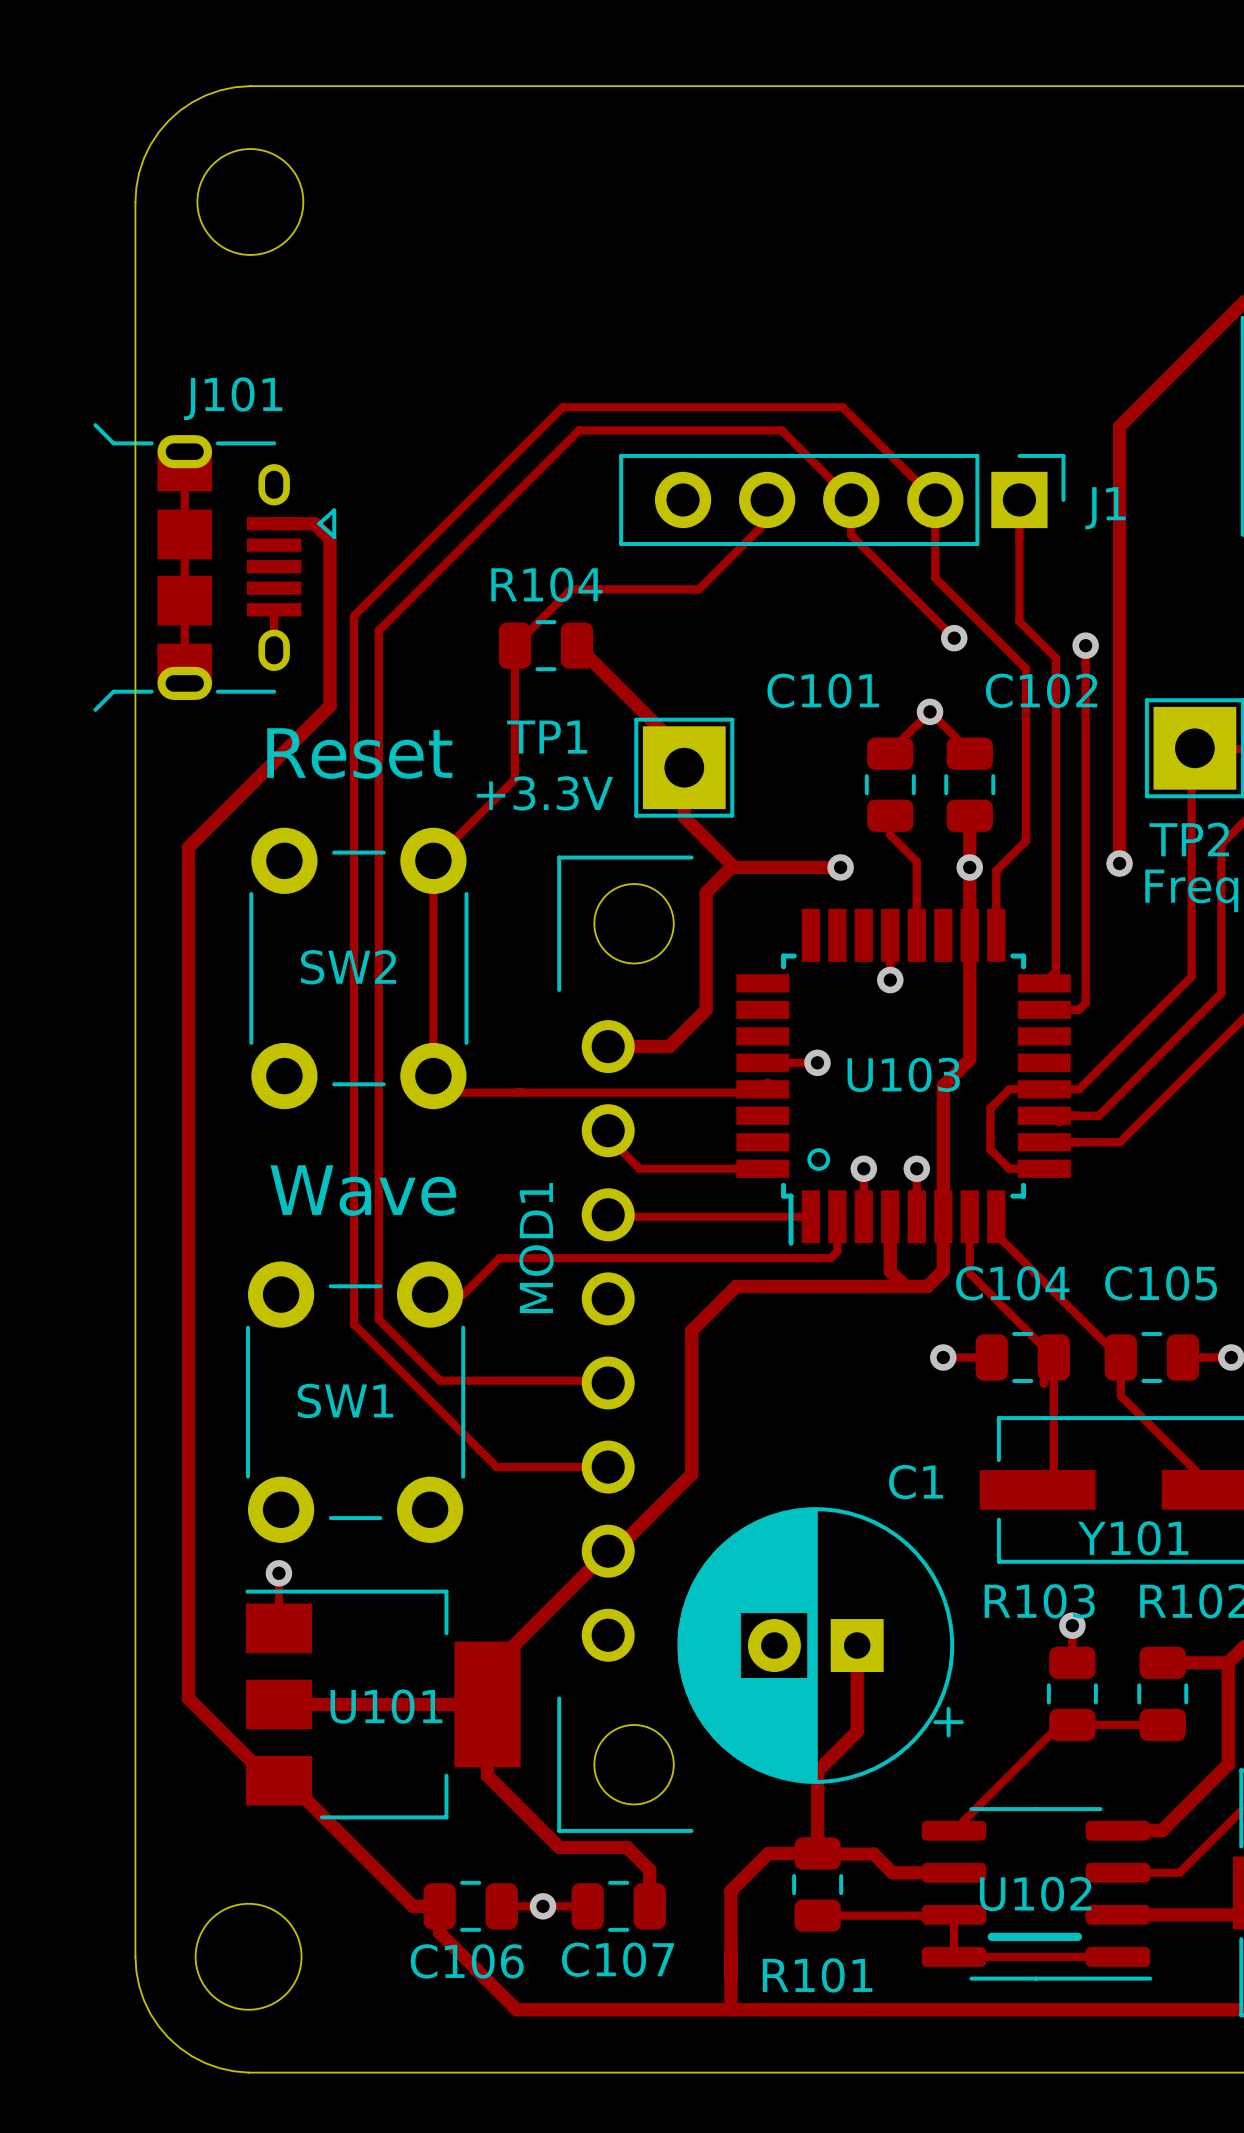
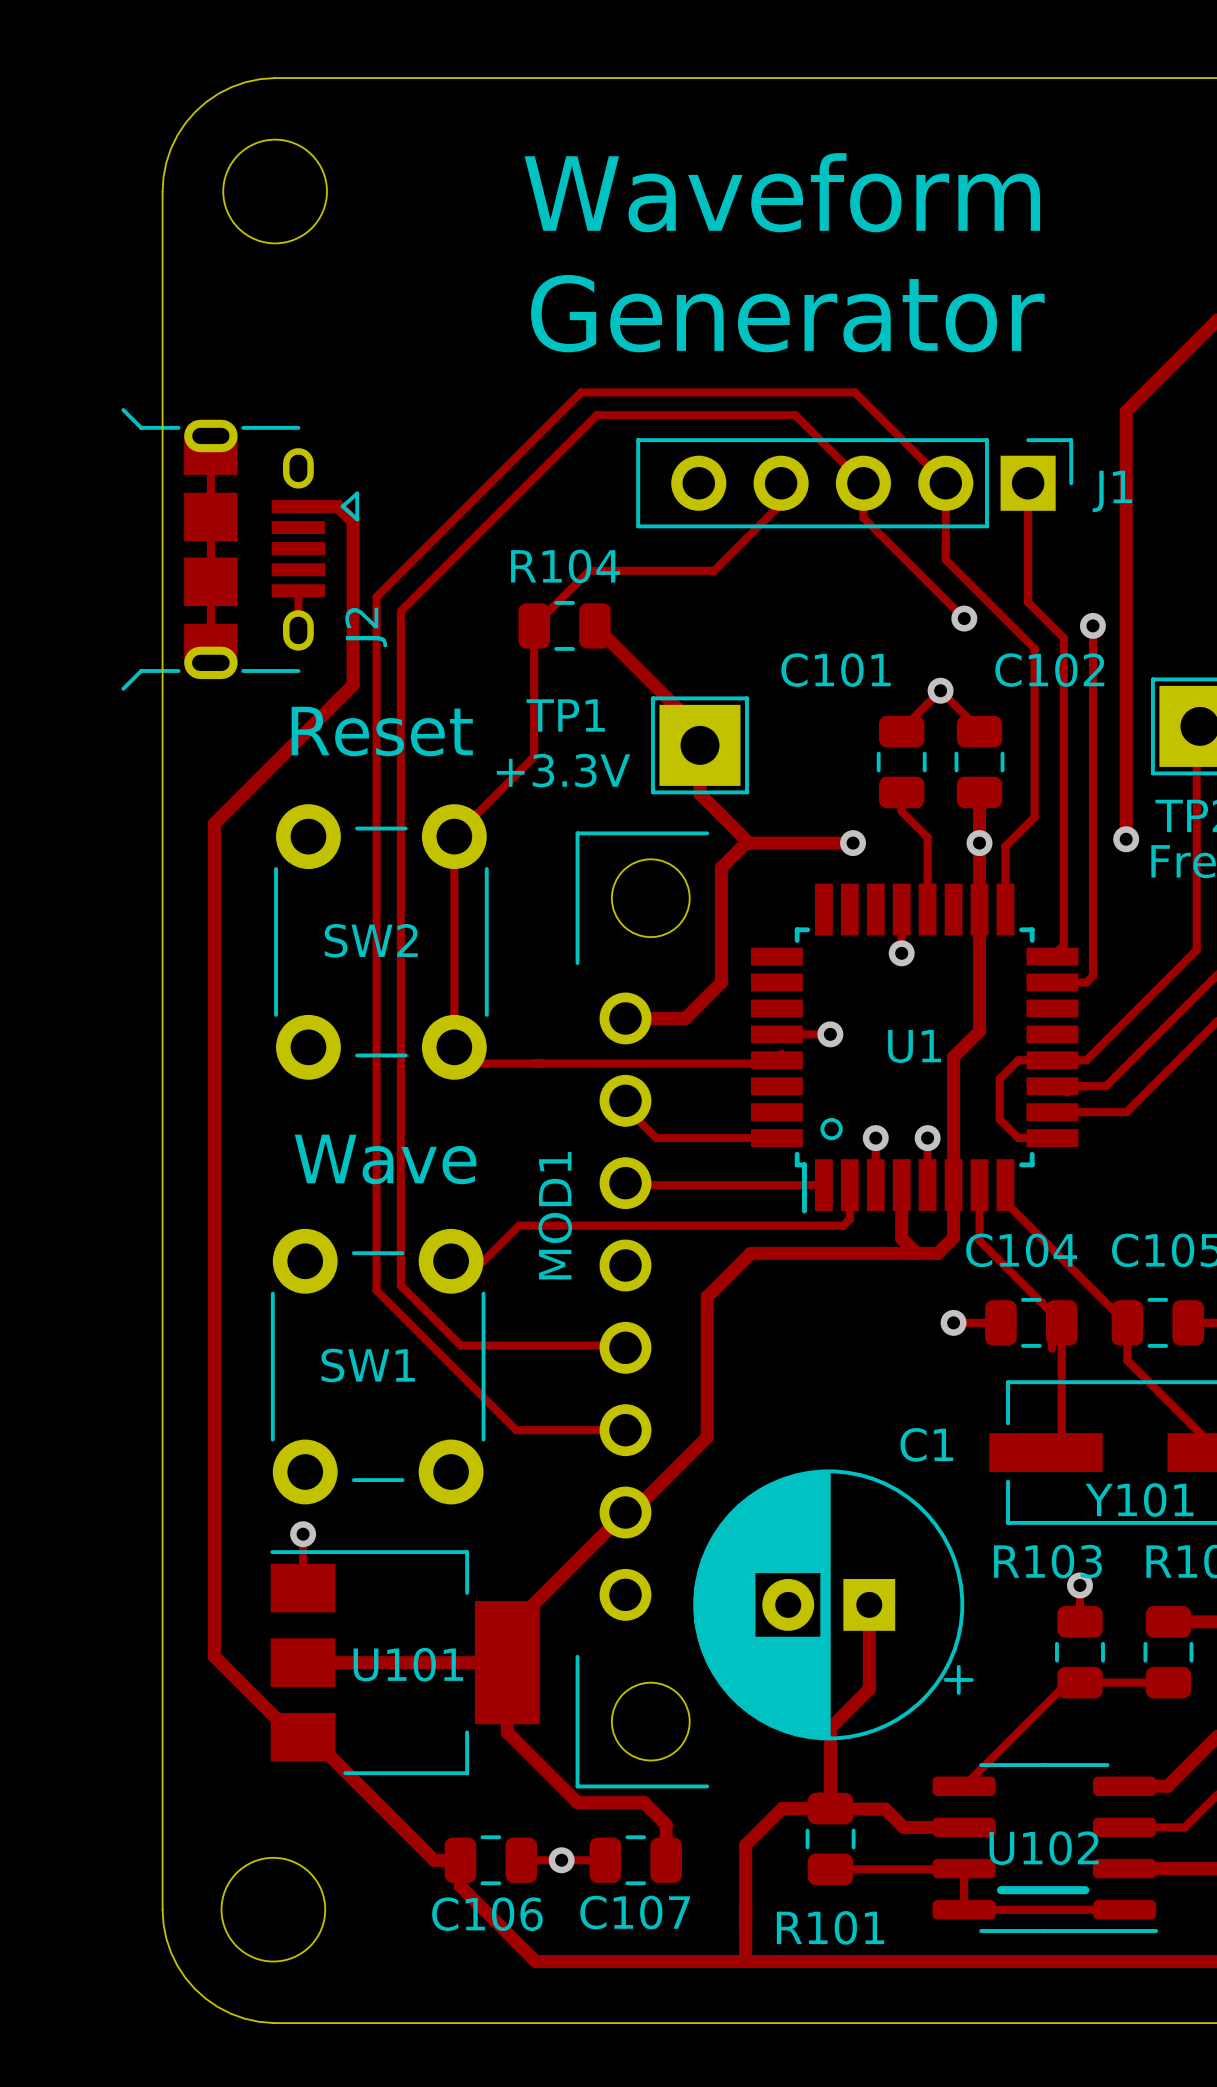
text: none -> Waveform (782, 192)
text: none -> Generator (787, 313)
J101 name: J101 (233, 398) -> J2 (366, 627)
U103 name: U103 (903, 1074) -> U1 (914, 1046)

